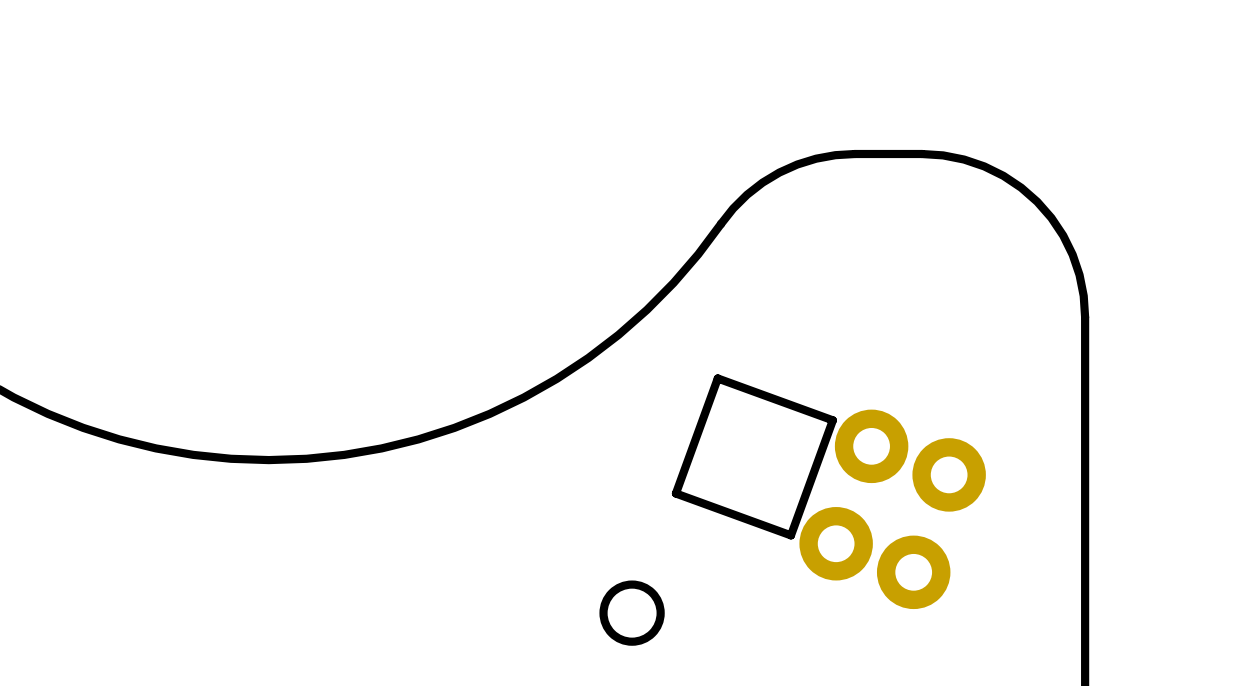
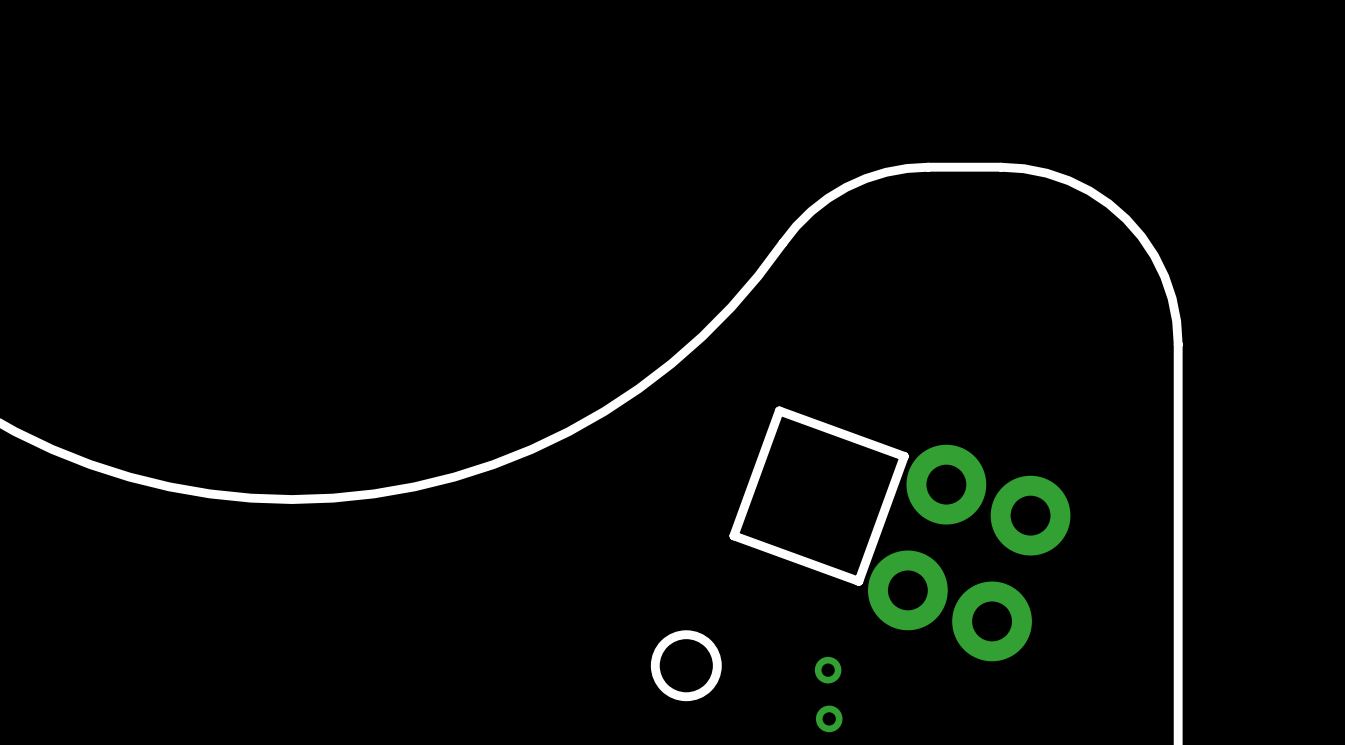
via: none -> (828, 670)
via: none -> (829, 718)

